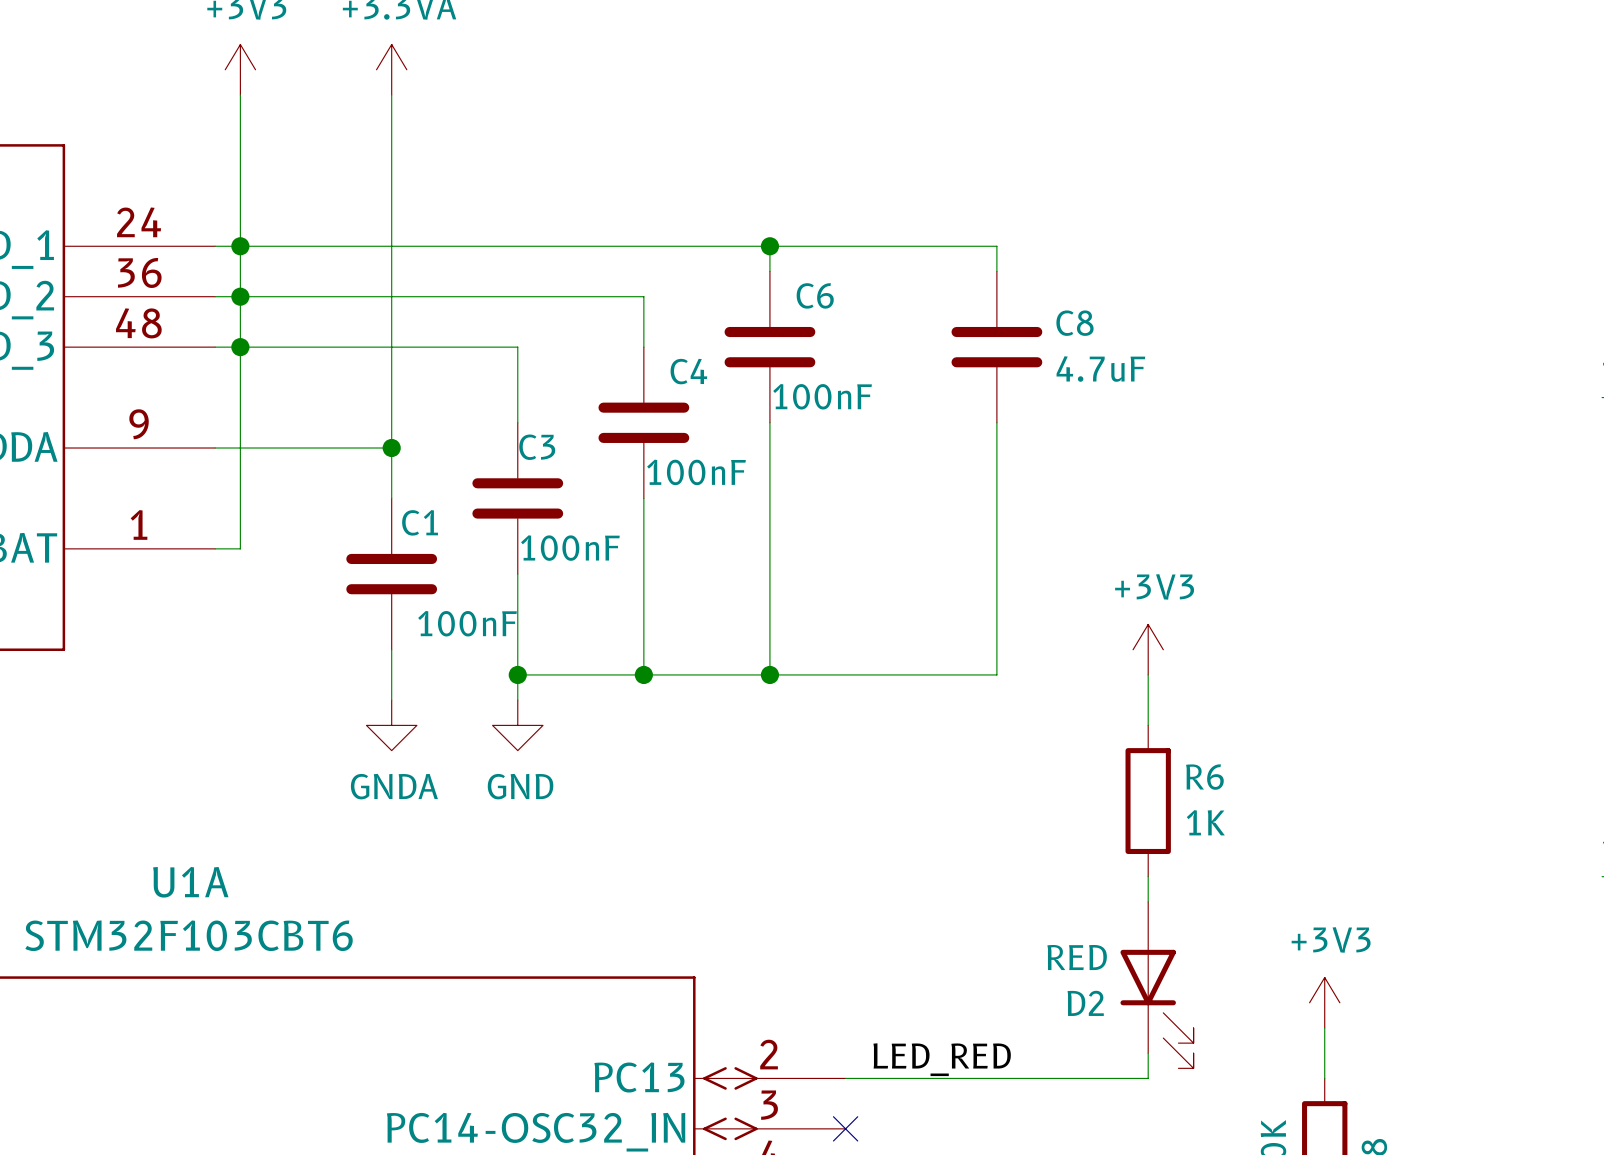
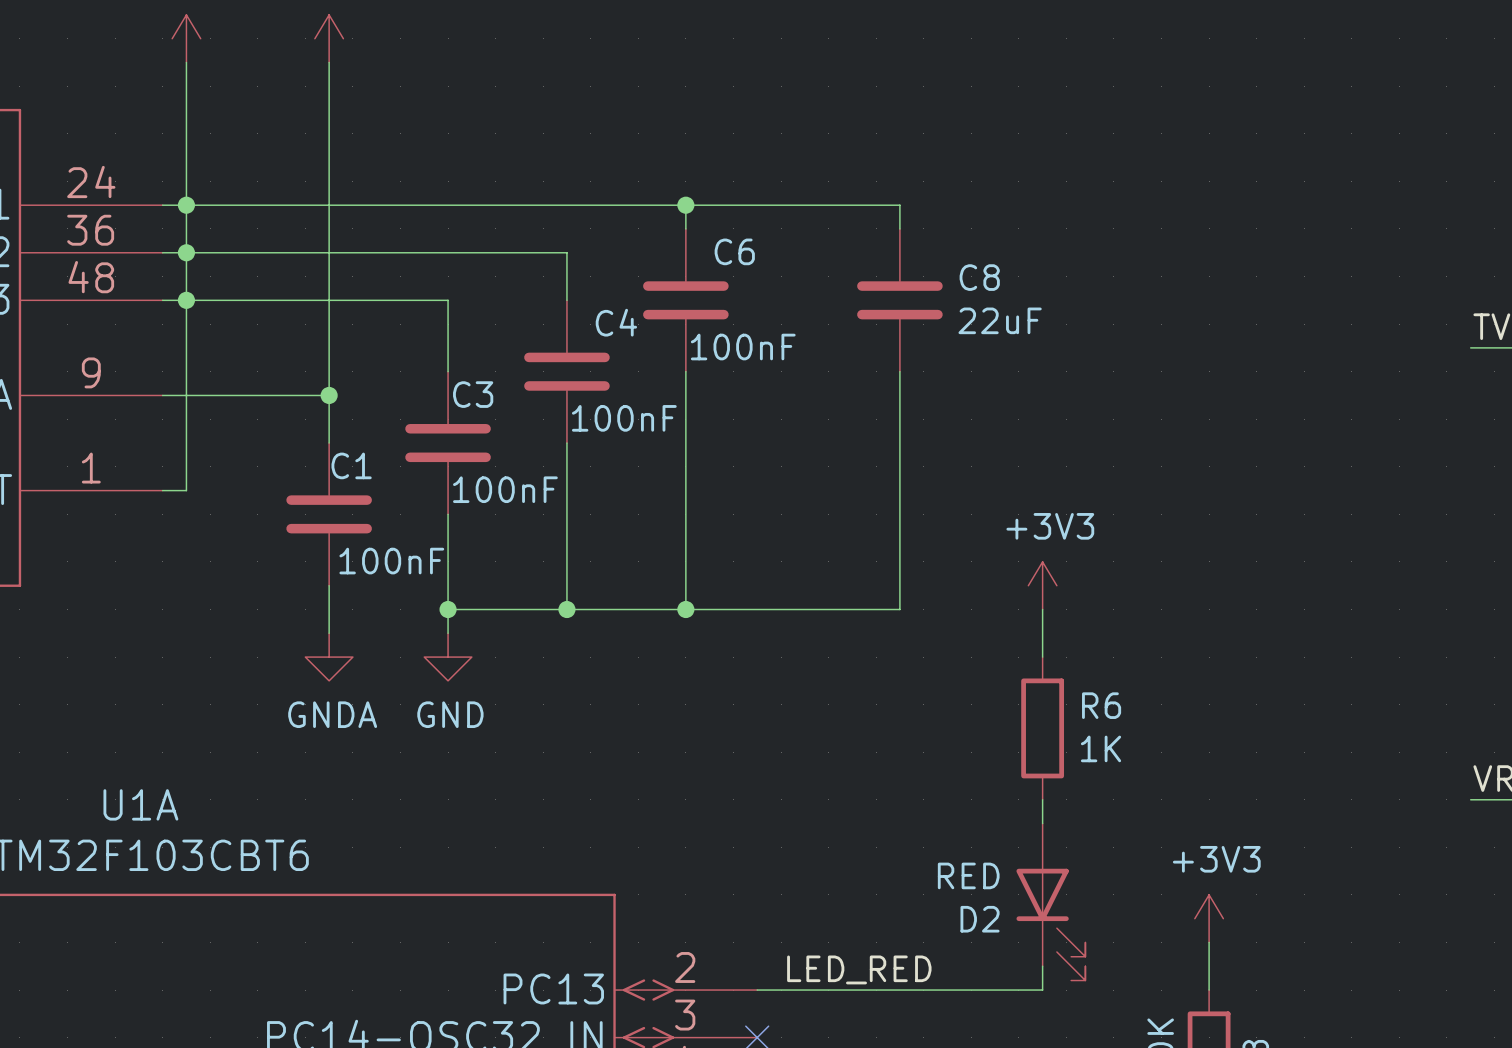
C8 value: 4.7uF (1100, 369) -> 22uF (1000, 320)

